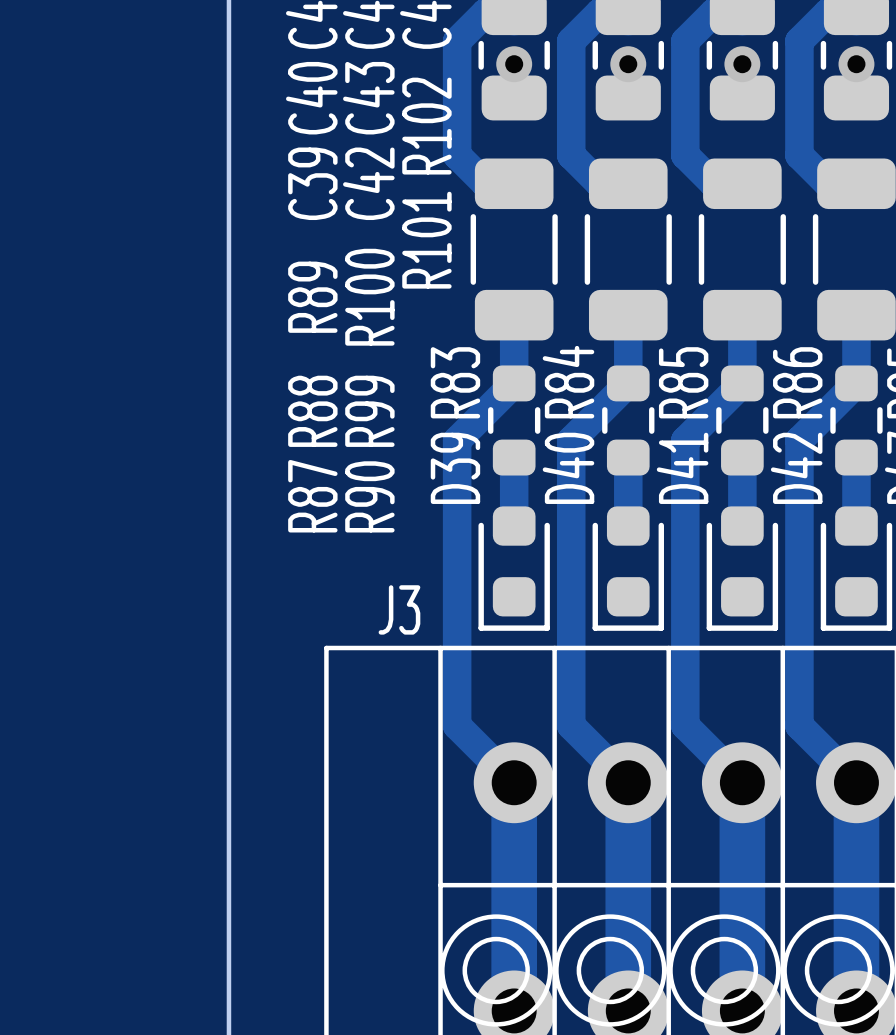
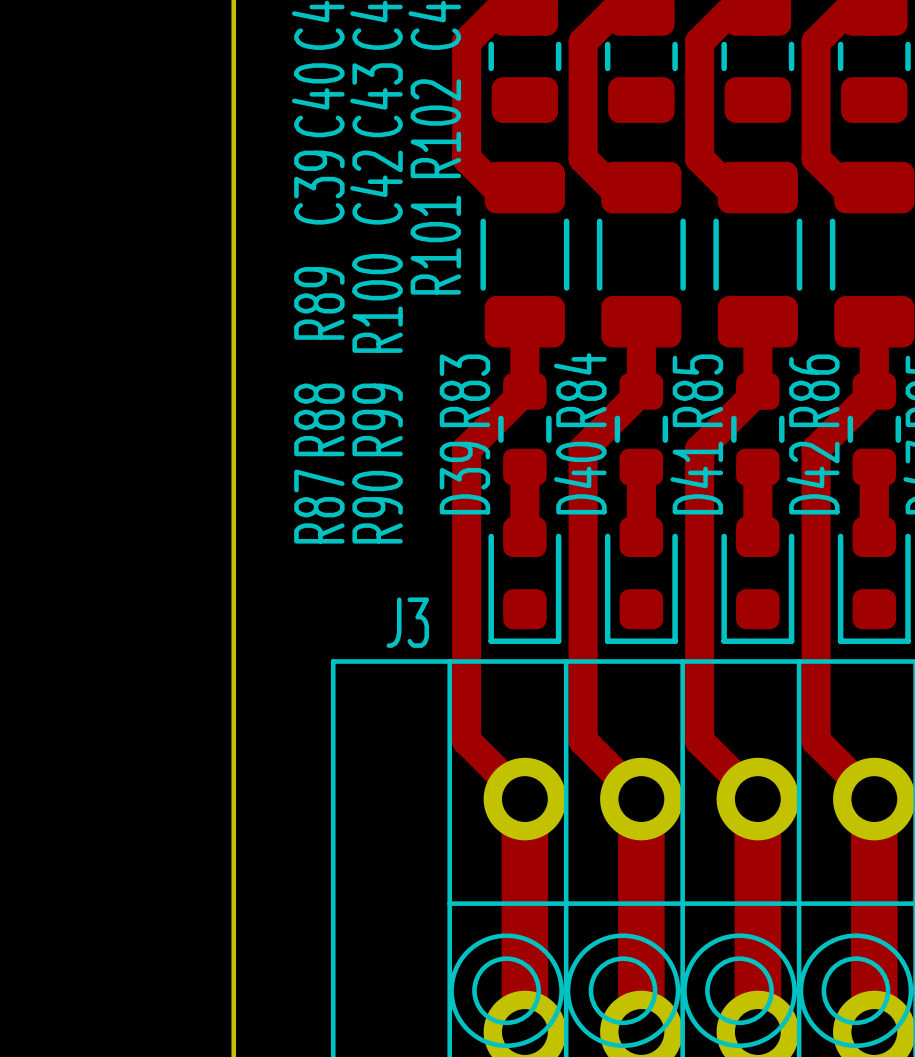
via: (514, 64) -> none
via: (628, 64) -> none
via: (742, 64) -> none
via: (856, 64) -> none

